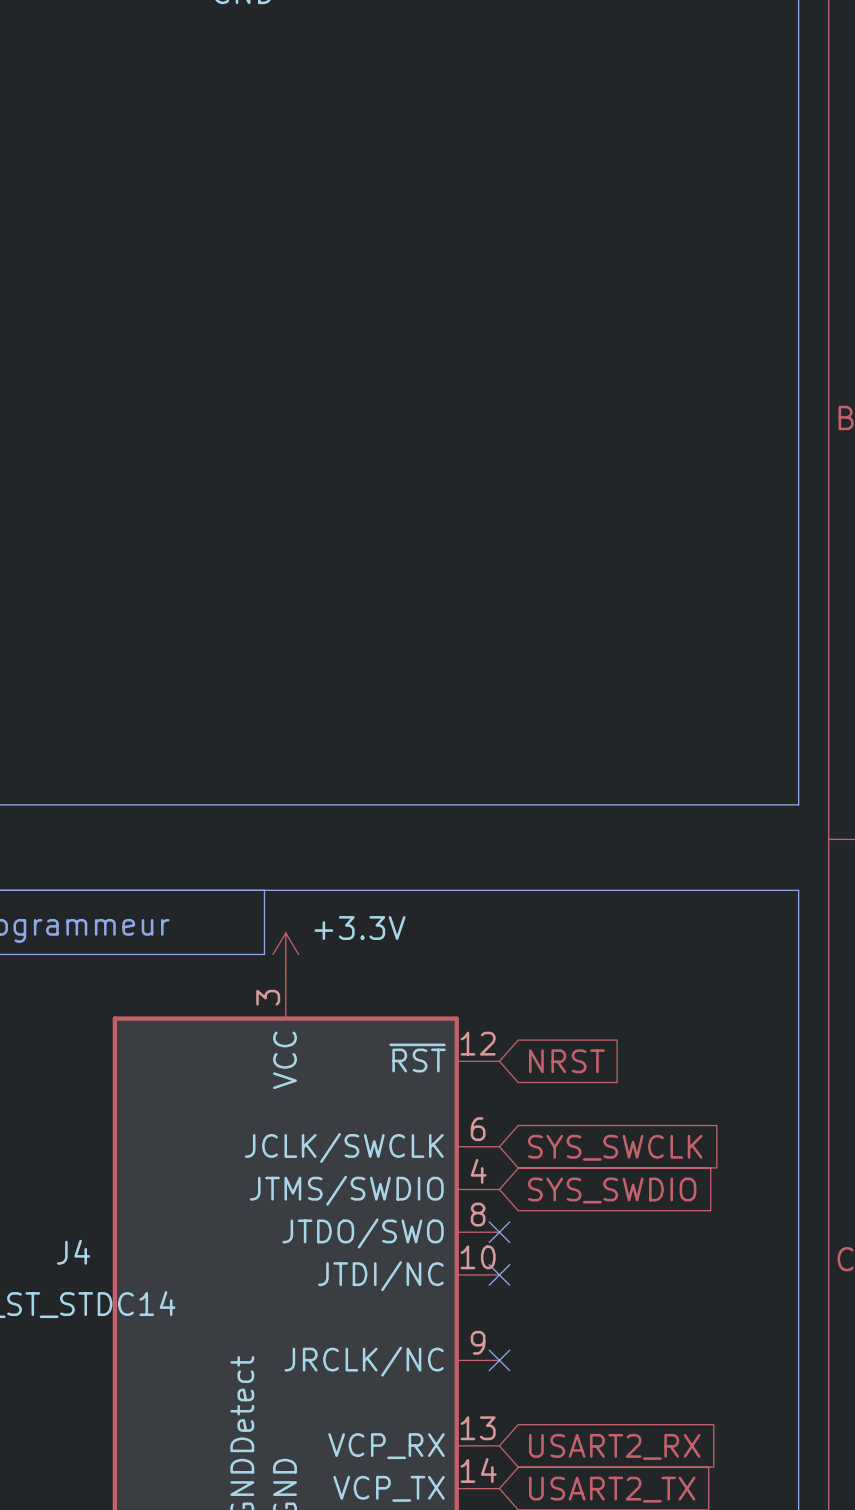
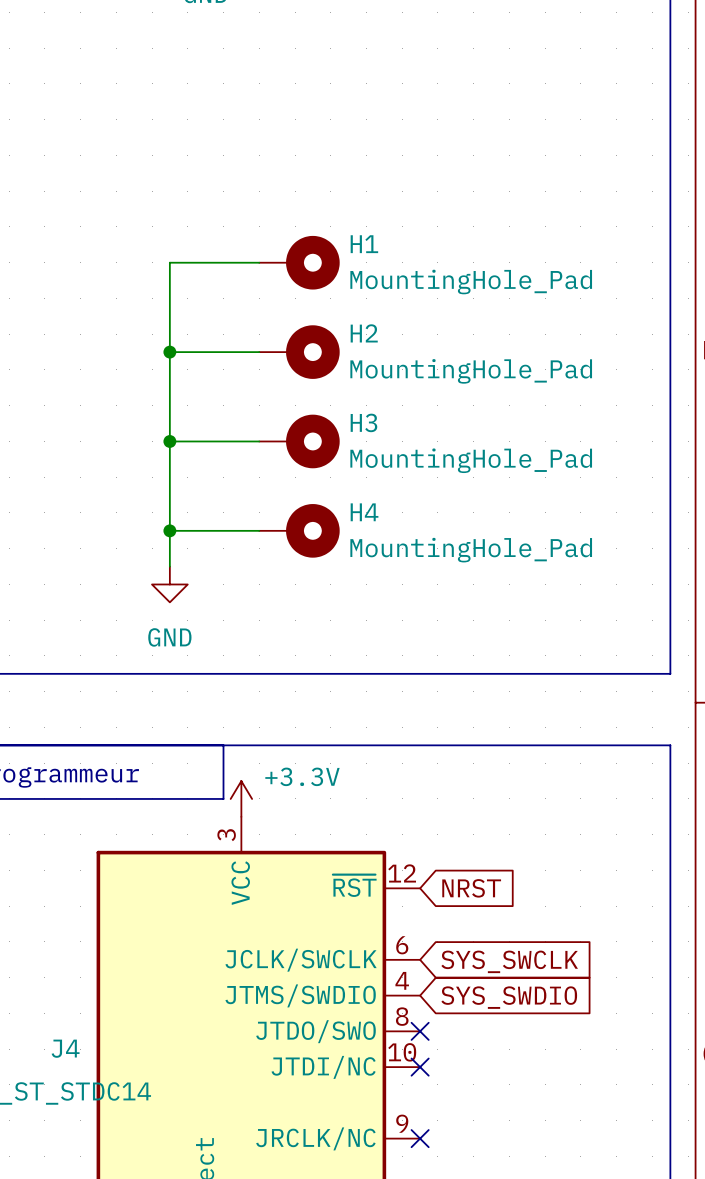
wire: none -> (259, 262) (169, 262) (169, 566)
H1: none -> MountingHole_Pad (299, 262)
wire: none -> (169, 352) (259, 352)
junction: none -> (169, 352)
H2: none -> MountingHole_Pad (299, 352)
wire: none -> (169, 441) (259, 441)
junction: none -> (169, 441)
H3: none -> MountingHole_Pad (299, 441)
wire: none -> (169, 530) (259, 530)
junction: none -> (169, 530)
H4: none -> MountingHole_Pad (299, 530)
power symbol: none -> GND (169, 584)

